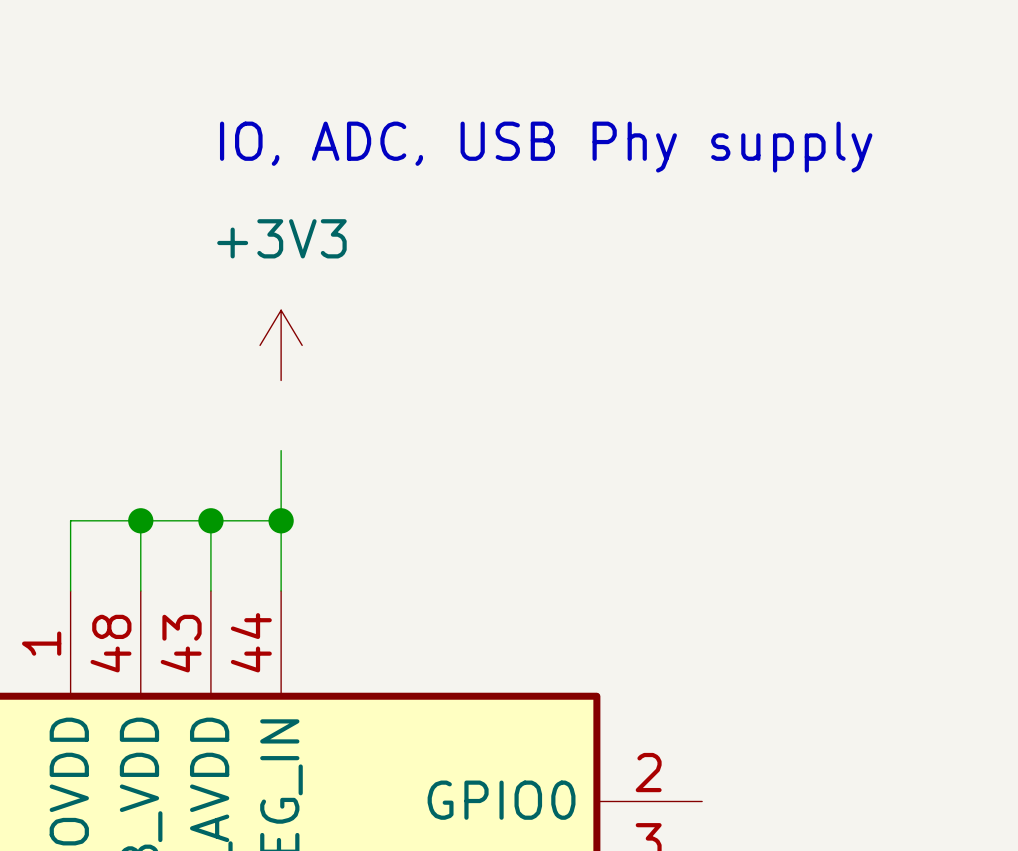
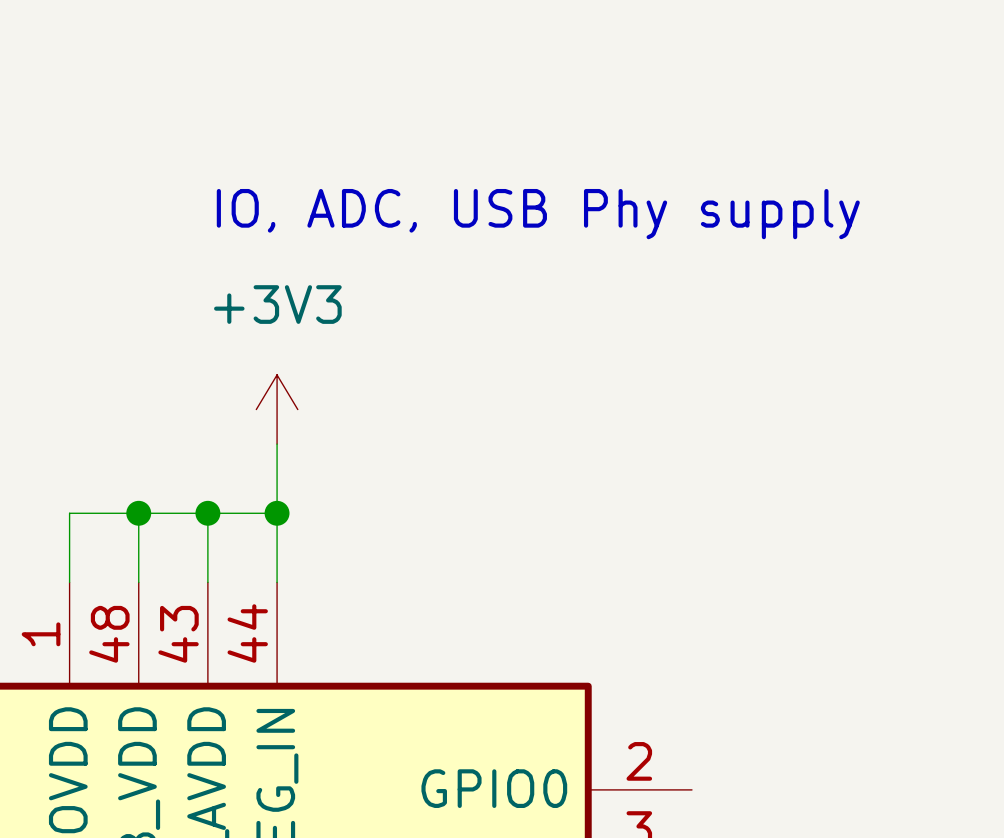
text position: IO, ADC, USB Phy supply (546, 147) -> IO, ADC, USB Phy supply (538, 214)
power symbol position: +3V3 (281, 345) -> +3V3 (277, 409)

